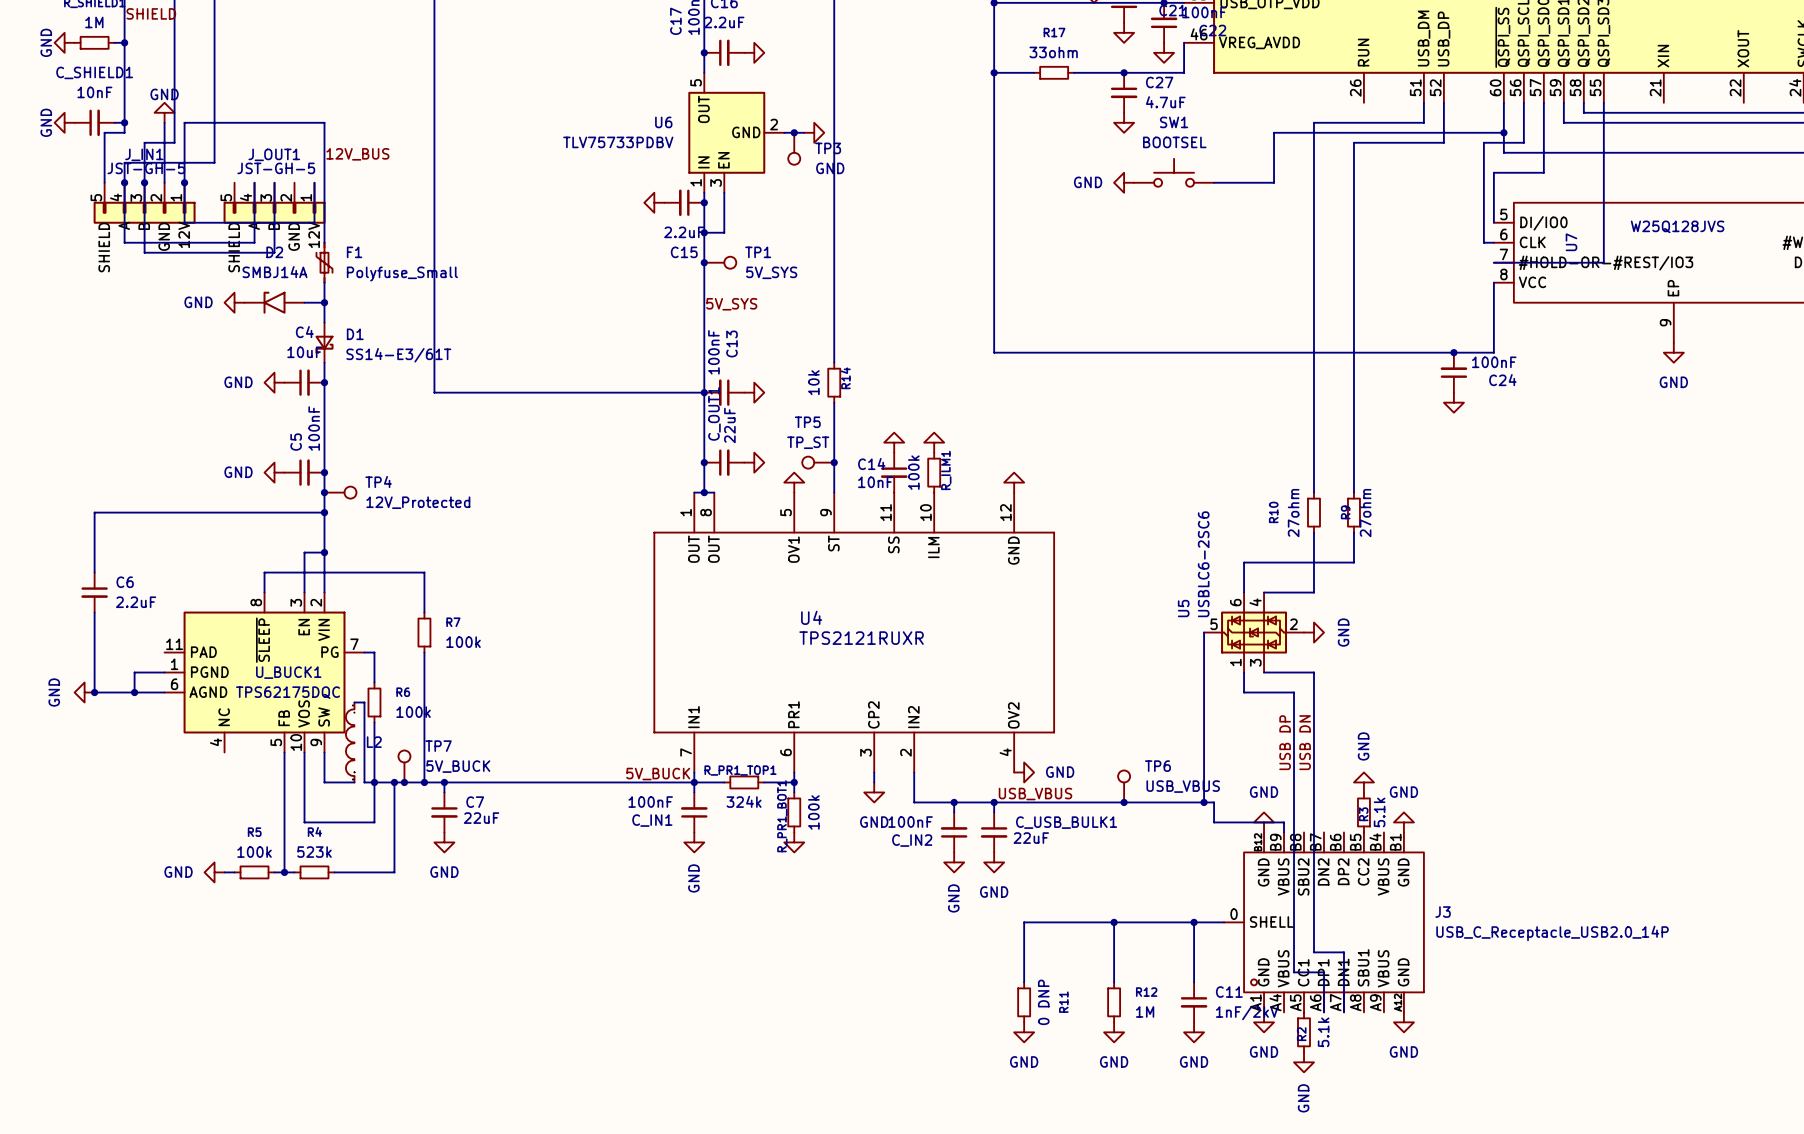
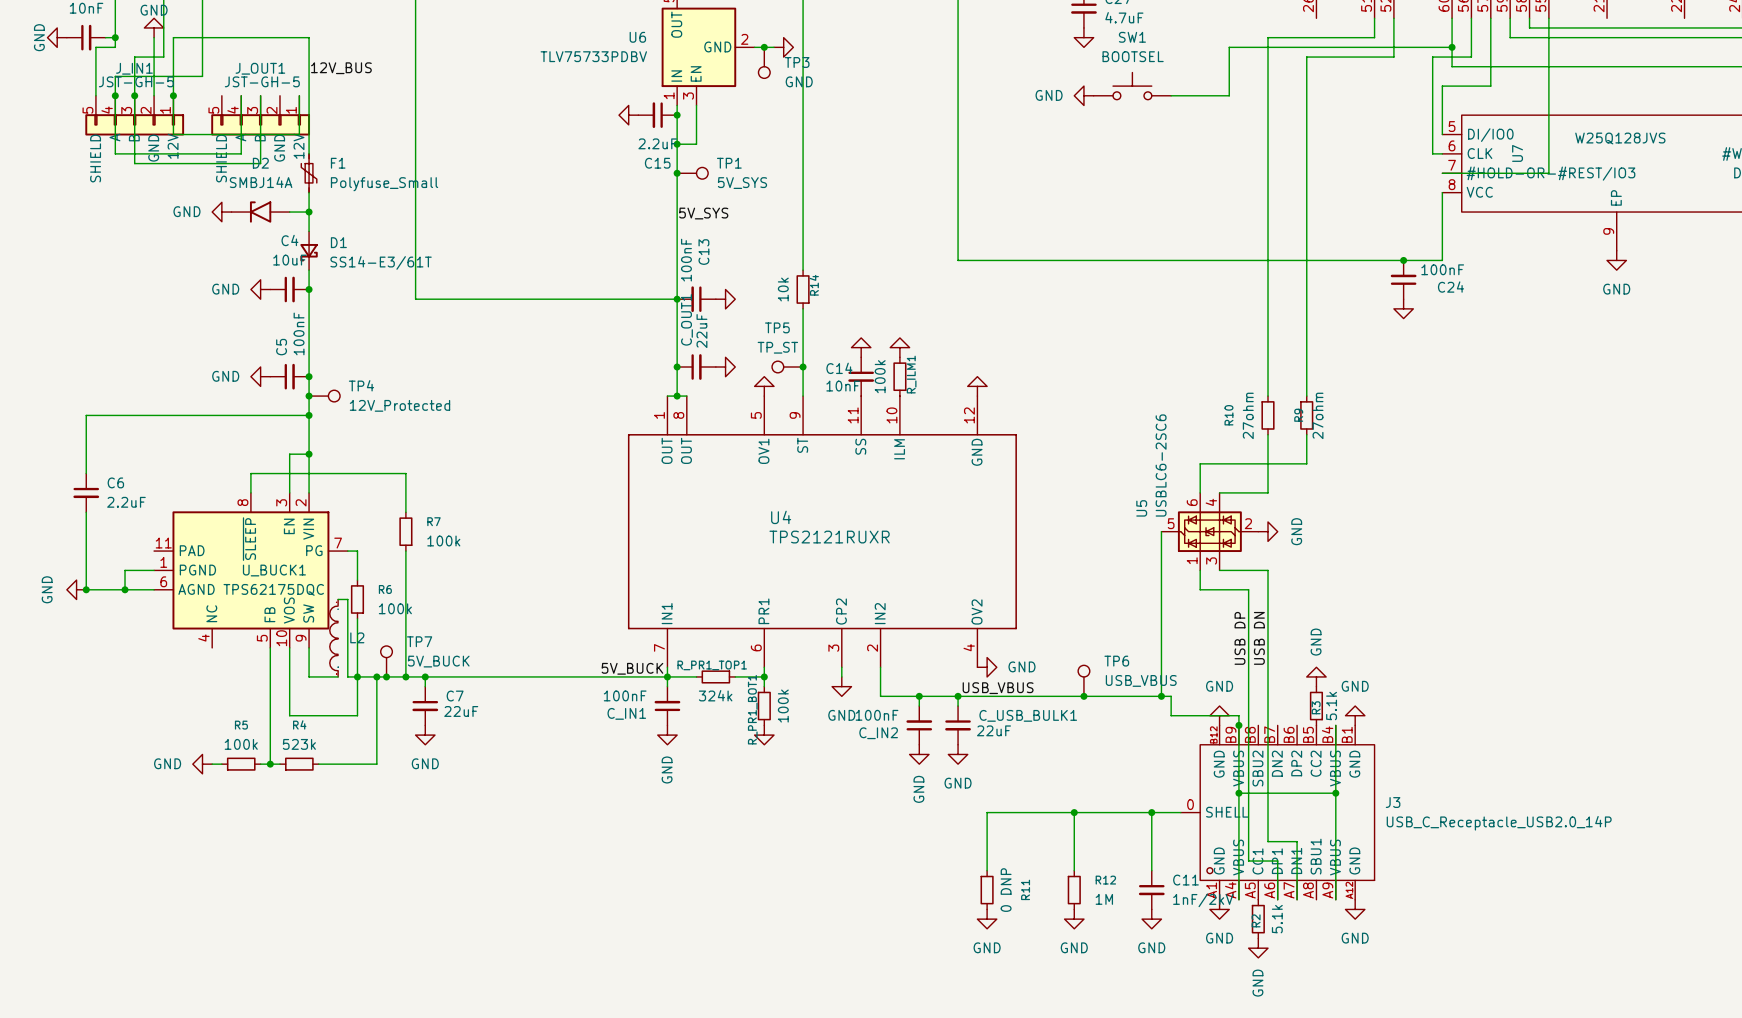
wire: none -> (1238, 725) (1238, 899)
junction: none -> (1238, 725)
wire: none -> (1335, 725) (1335, 899)
wire: none -> (1238, 793) (1335, 793)
junction: none -> (1238, 793)
junction: none -> (1335, 793)

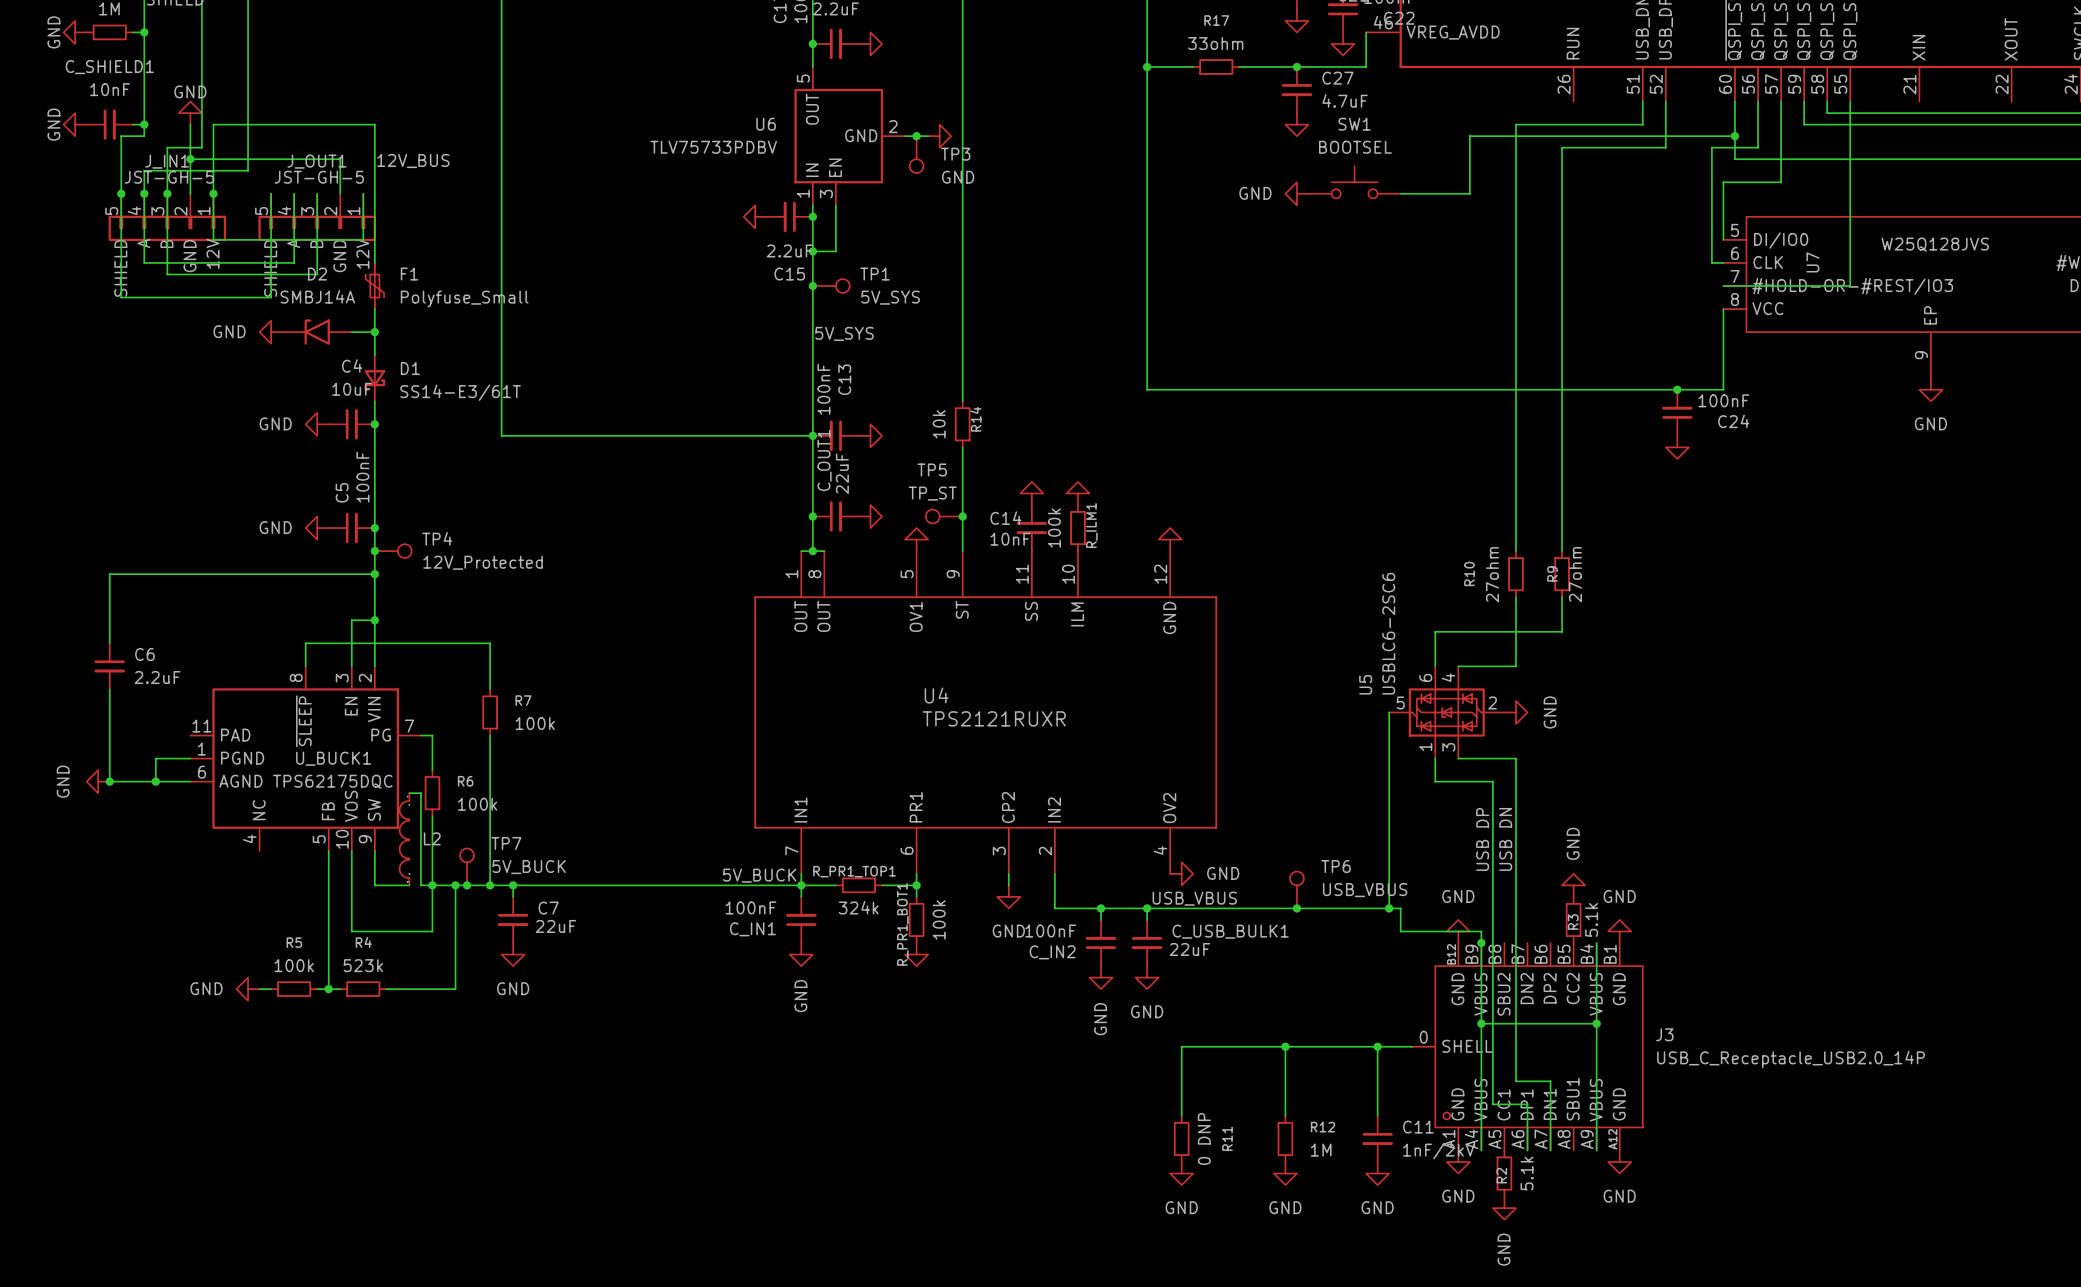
wire: none -> (190, 159) (340, 159) (340, 193)
junction: none -> (190, 159)
wire: none -> (121, 193) (121, 297) (271, 297) (271, 193)
junction: none -> (121, 193)

